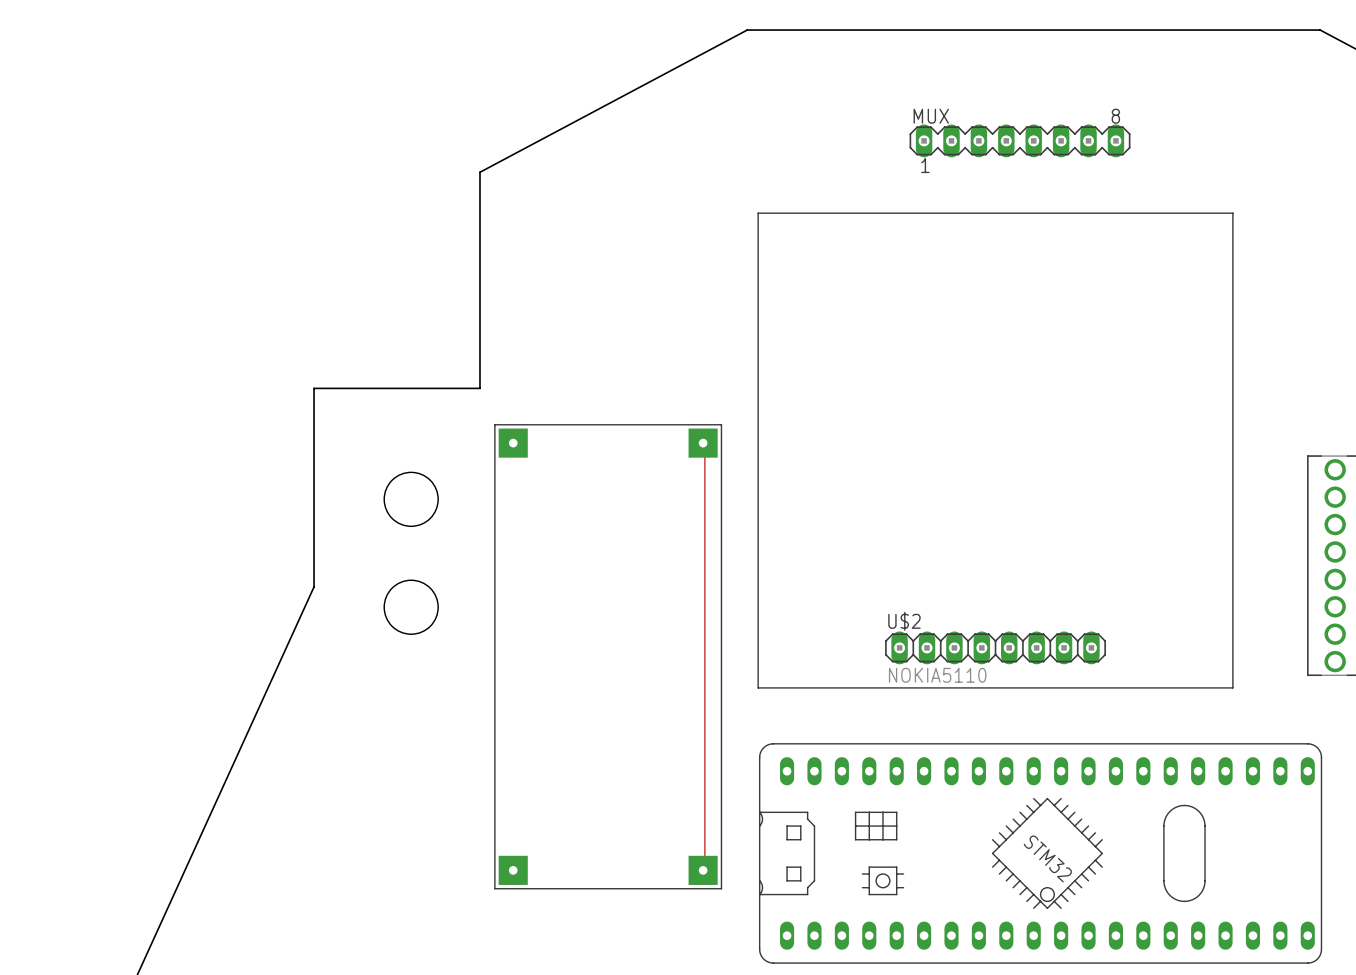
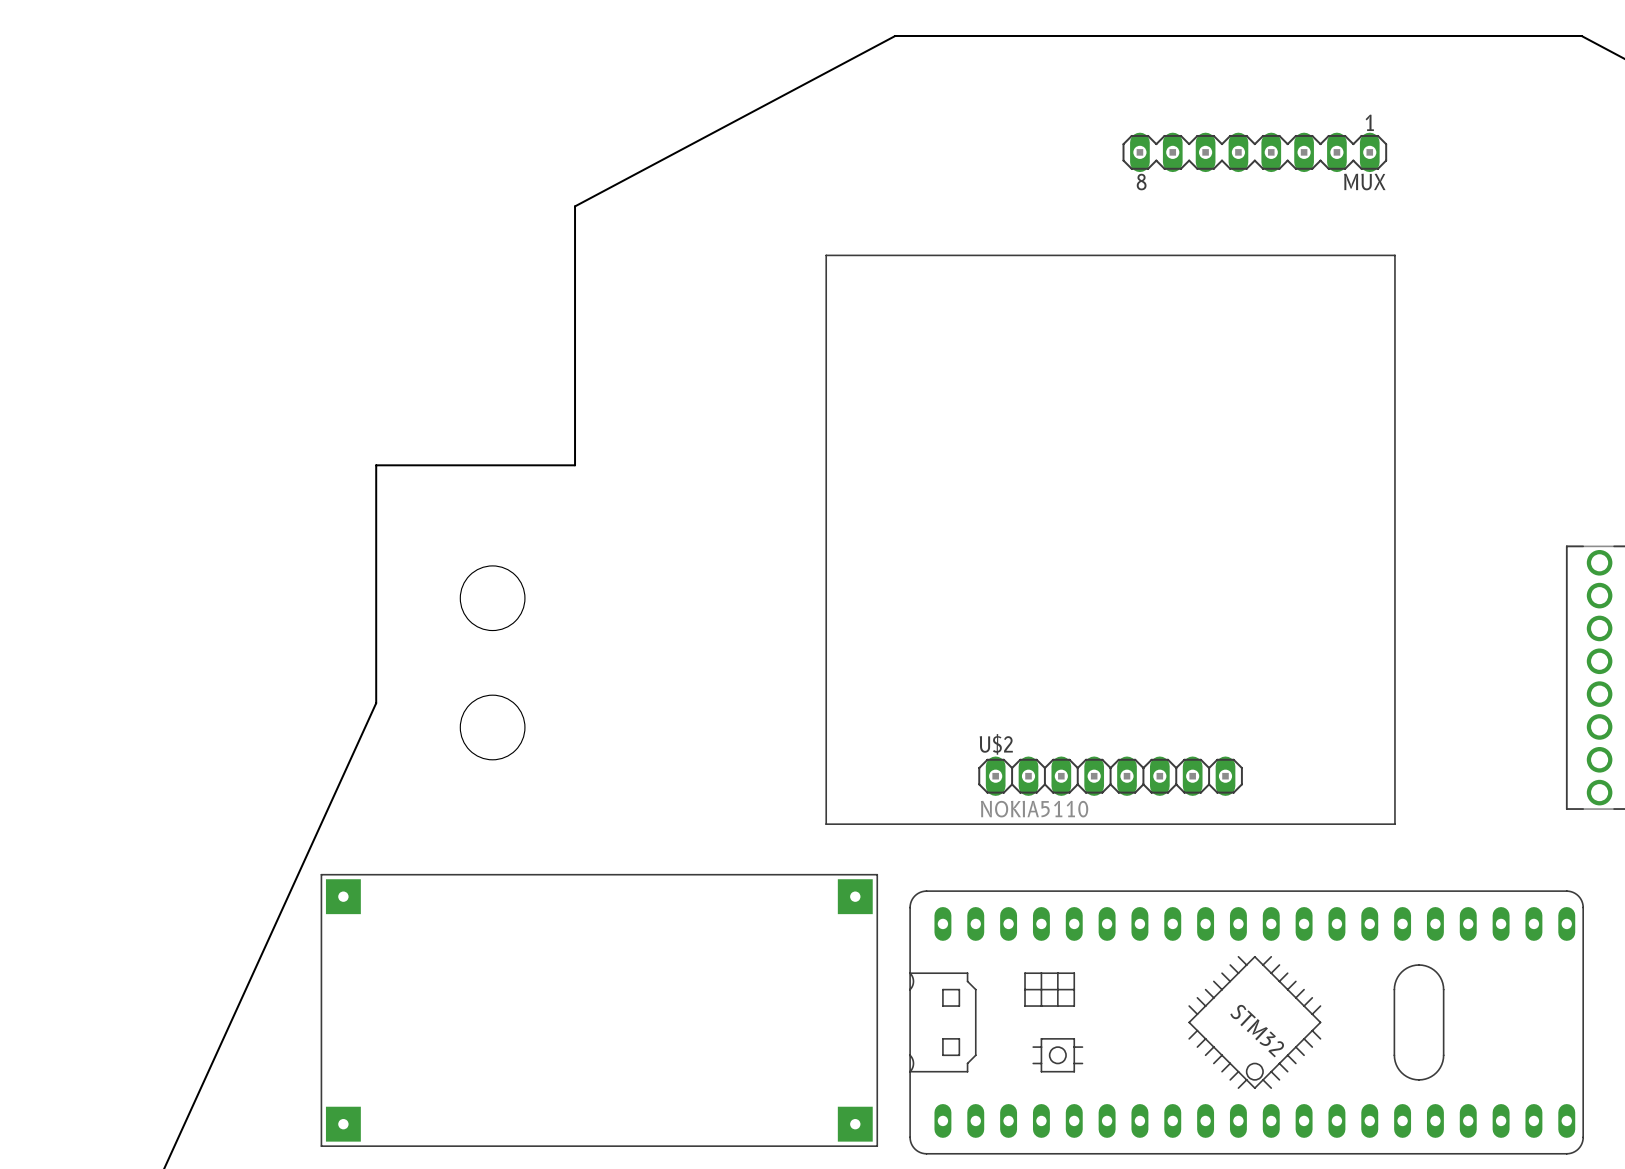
MUX: none -> (1254, 152)
MUX: (1020, 140) -> none
track: (703, 443) (704, 444) (704, 880) -> none
U$2 position: (995, 450) -> (1110, 539)
part rotation: 0° (608, 656) -> 90° clockwise (599, 1010)

